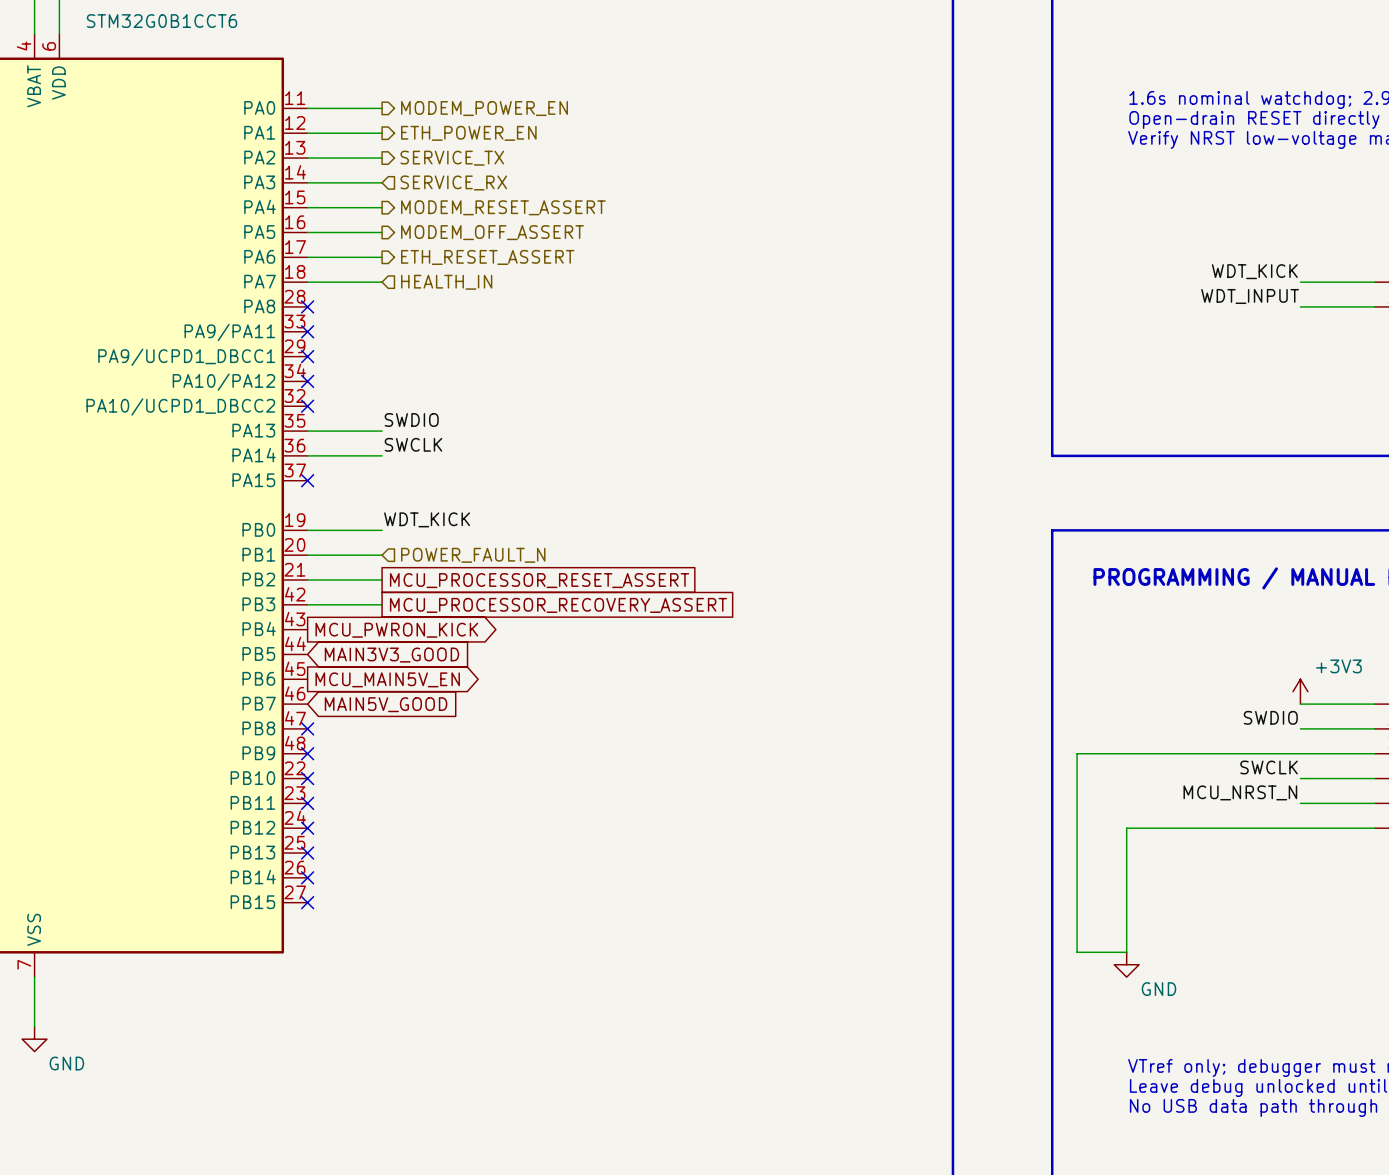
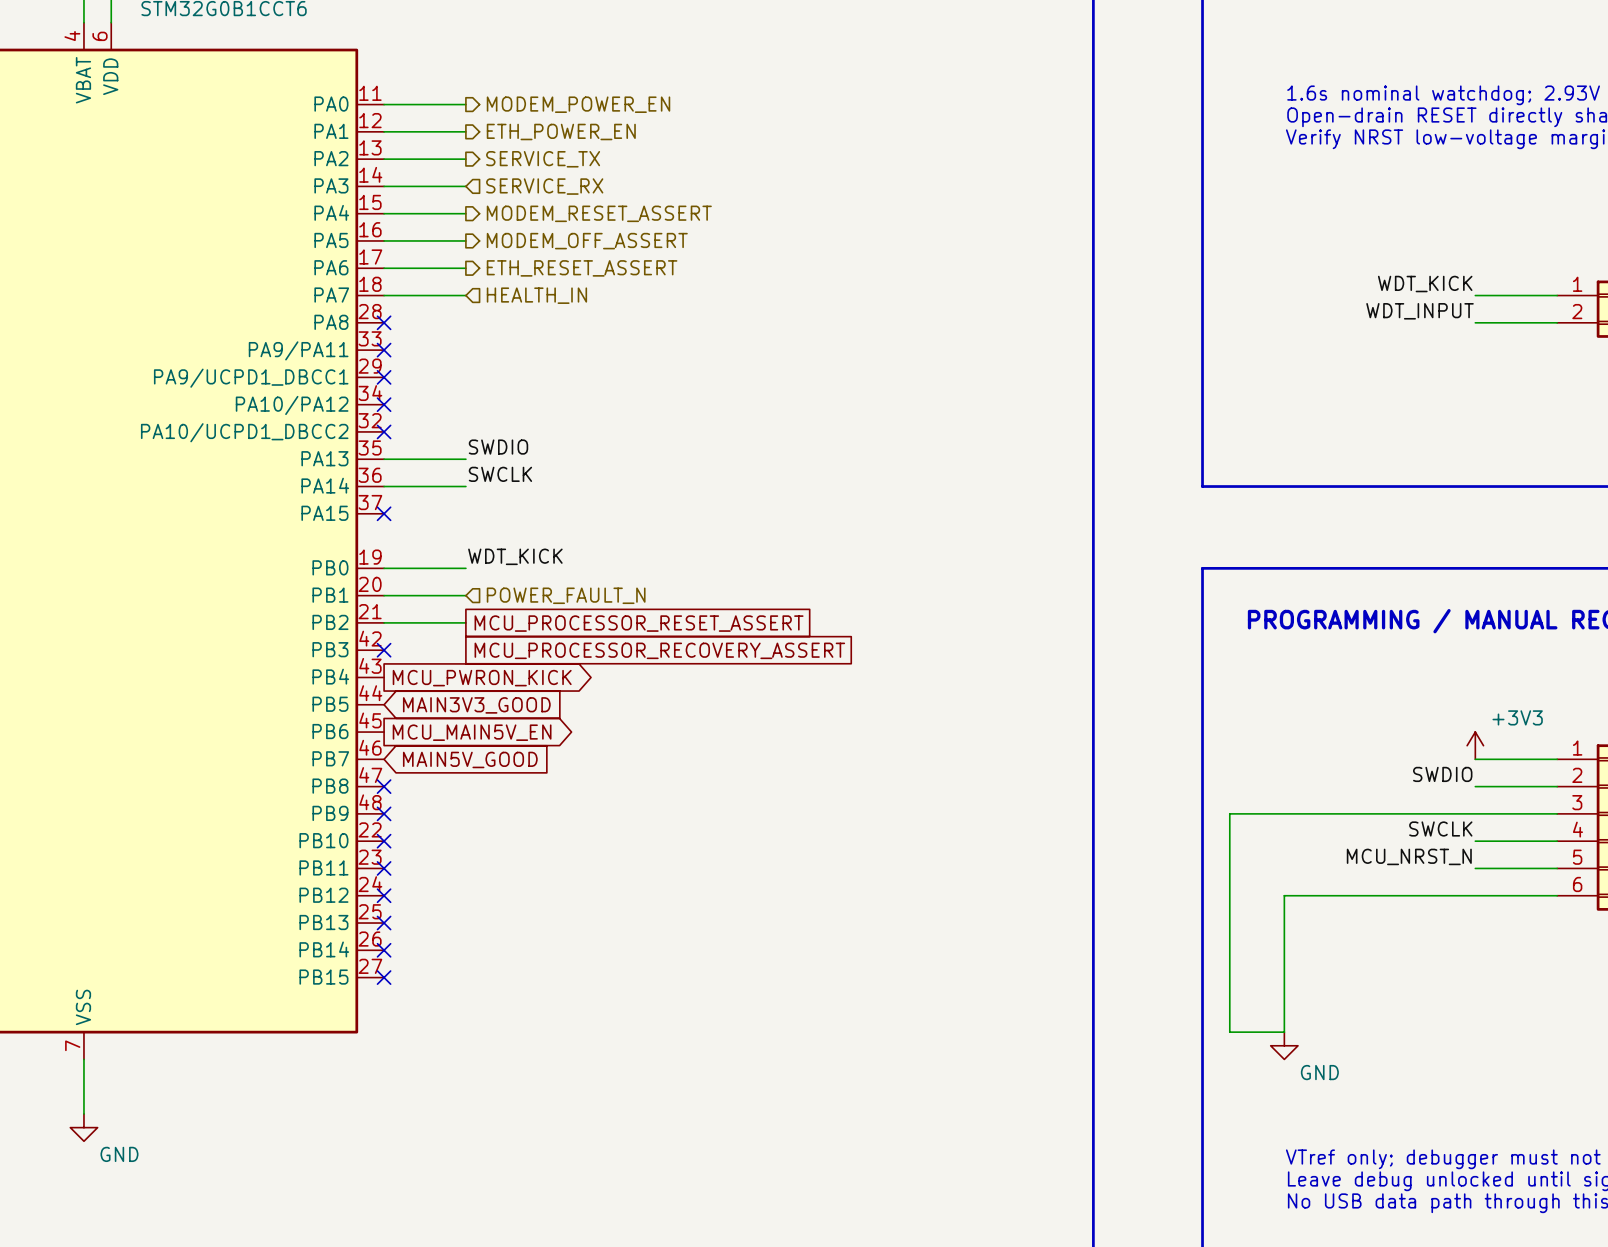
wire: (307, 604) (382, 604) -> none
no-connect mark: none -> (384, 650)

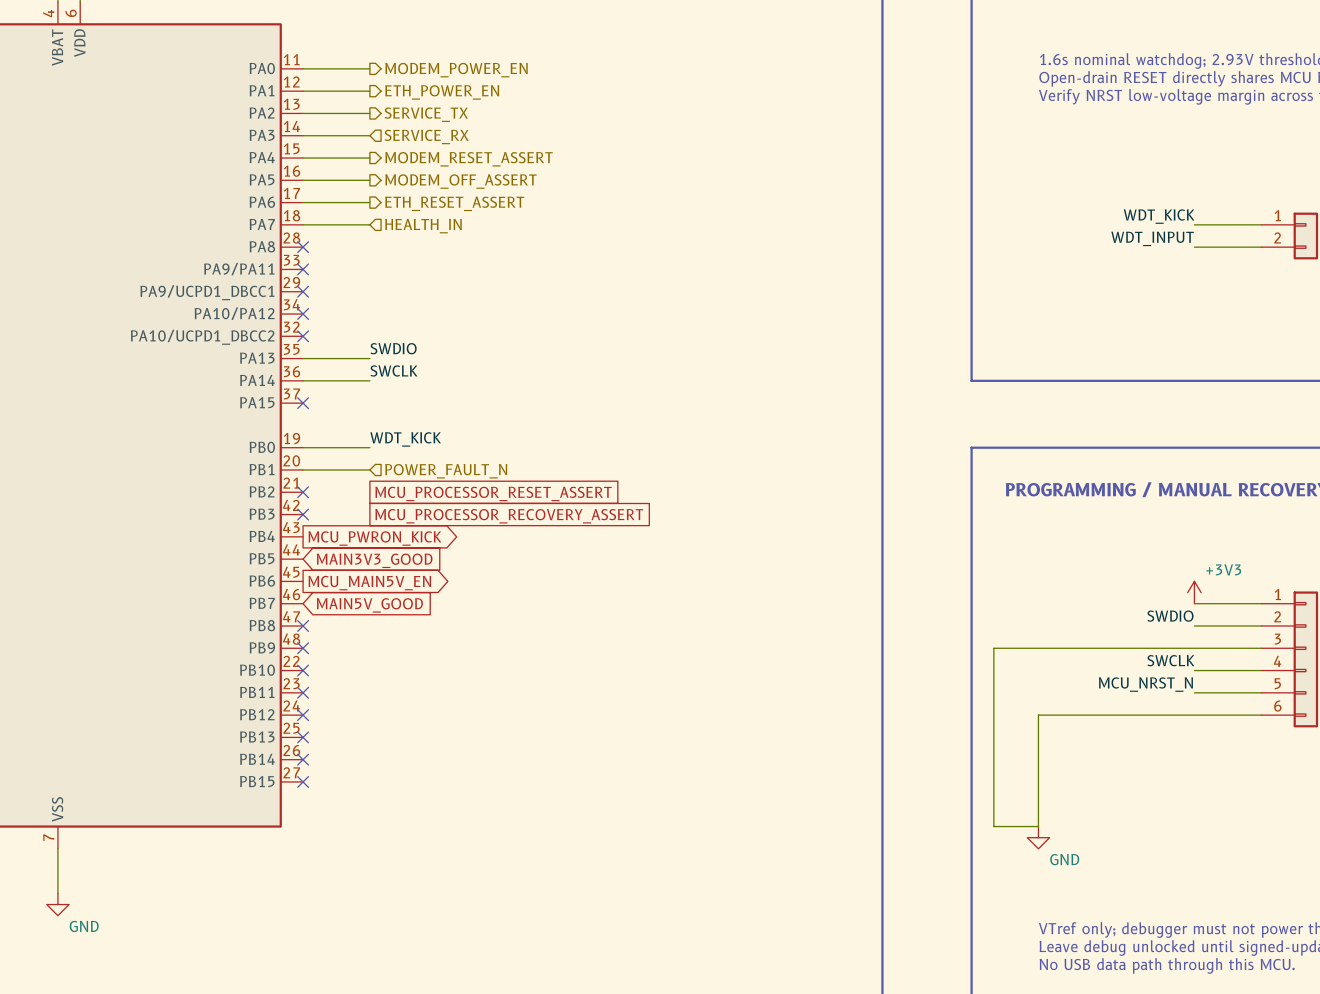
wire: (384, 622) (465, 622) -> none
no-connect mark: none -> (303, 492)

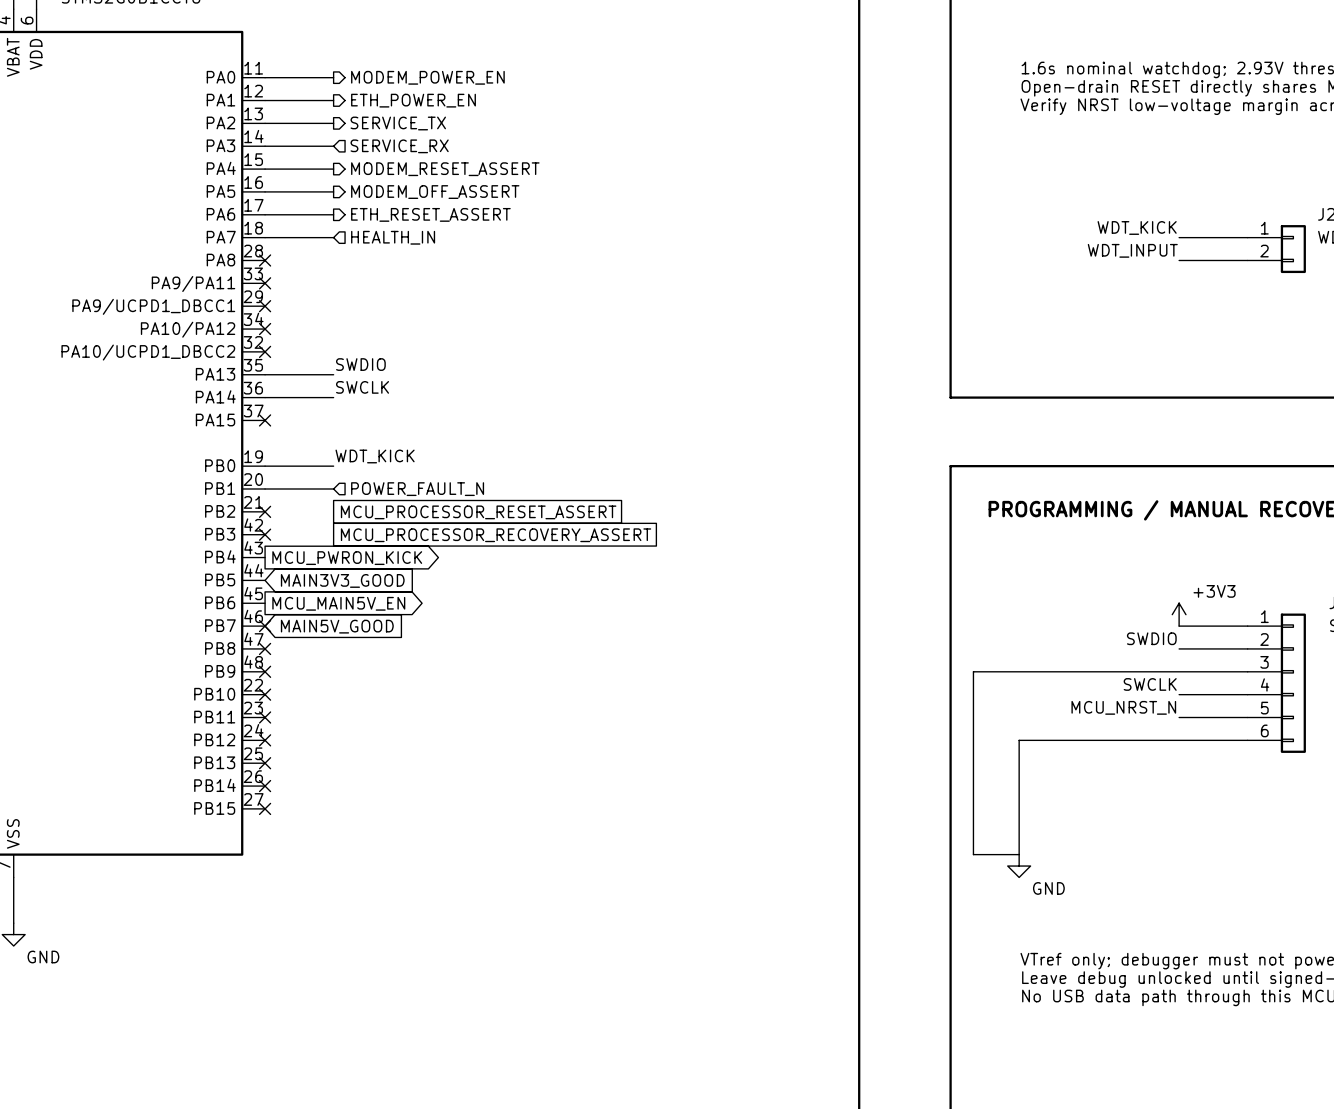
no-connect mark: none -> (265, 626)

